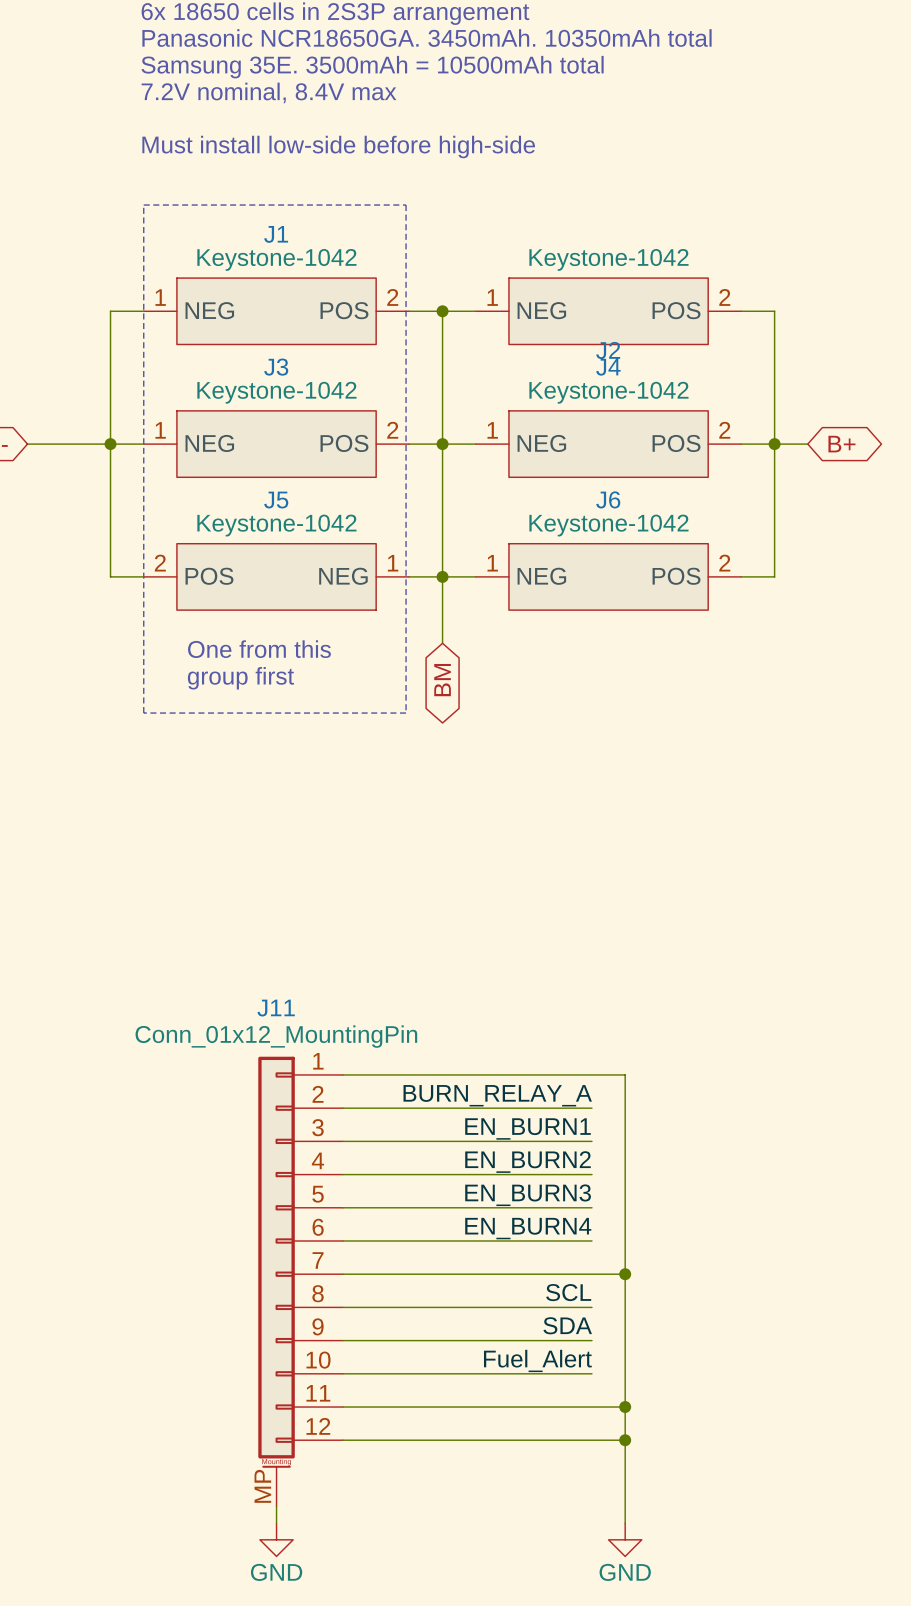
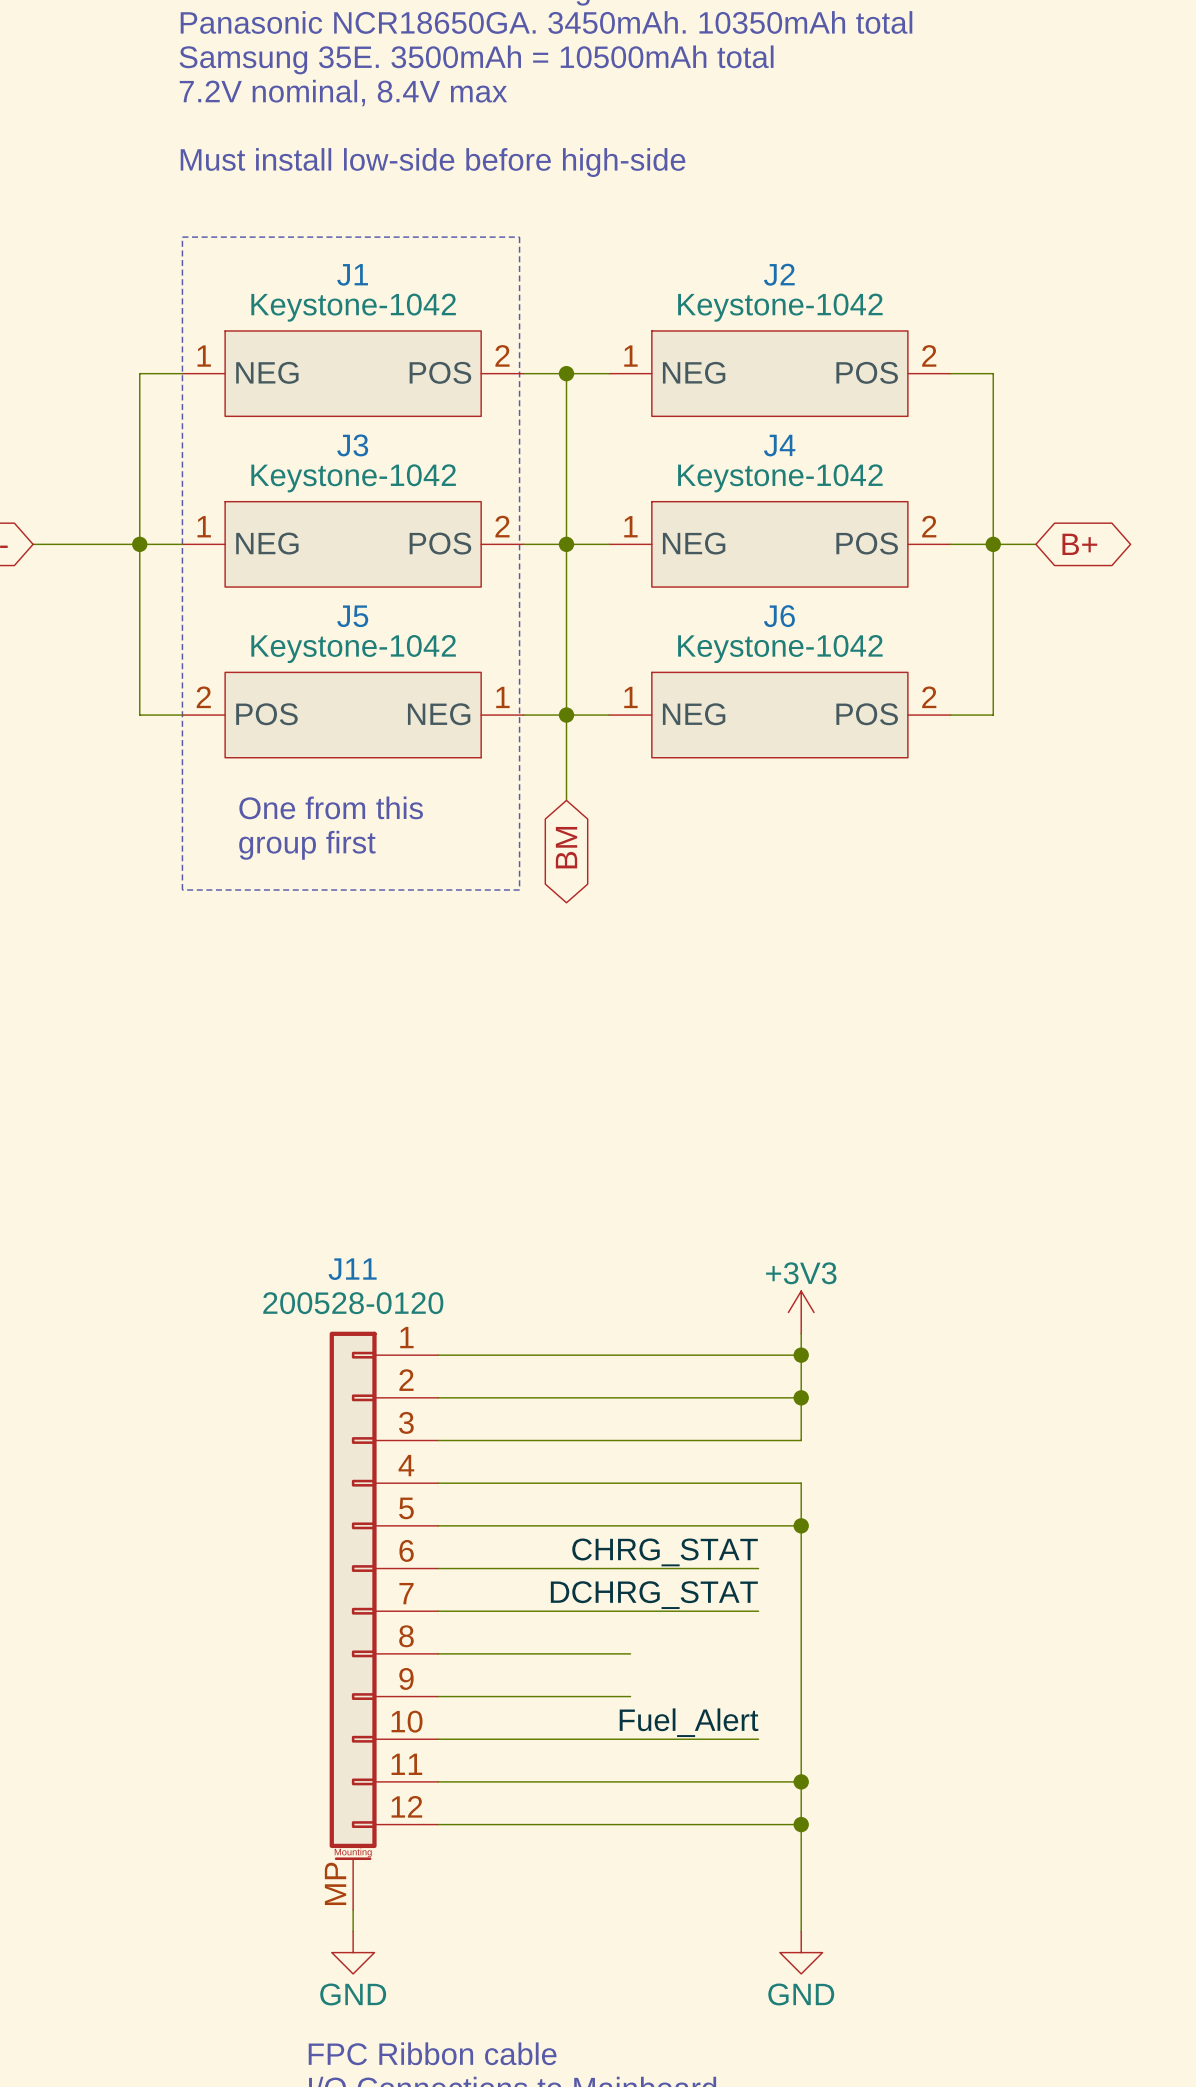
J2 name position: J2 (608, 350) -> J2 (779, 274)
J11 value: Conn_01x12_MountingPin (276, 1036) -> 200528-0120 (353, 1303)
power symbol: none -> +3V3 (801, 1312)
wire: none -> (801, 1333) (801, 1355)
junction: none -> (801, 1355)
label: BURN_RELAY_A (497, 1095) -> none
wire: none -> (758, 1397) (801, 1397)
junction: none -> (801, 1397)
label: EN_BURN1 (528, 1128) -> none
wire: (625, 1141) (625, 1174) -> (801, 1440) (758, 1440)
label: EN_BURN2 (527, 1162) -> none
wire: none -> (758, 1483) (801, 1483)
label: EN_BURN3 (528, 1195) -> none
label: EN_BURN4 (528, 1228) -> CHRG_STAT (665, 1552)
label: none -> DCHRG_STAT (654, 1595)
wire: (591, 1274) (625, 1274) -> (758, 1525) (801, 1525)
junction position: (625, 1274) -> (801, 1525)
label: SCL (568, 1292) -> none
wire: (492, 1307) (591, 1307) -> none
label: SDA (567, 1325) -> none
wire: (492, 1340) (591, 1340) -> none

